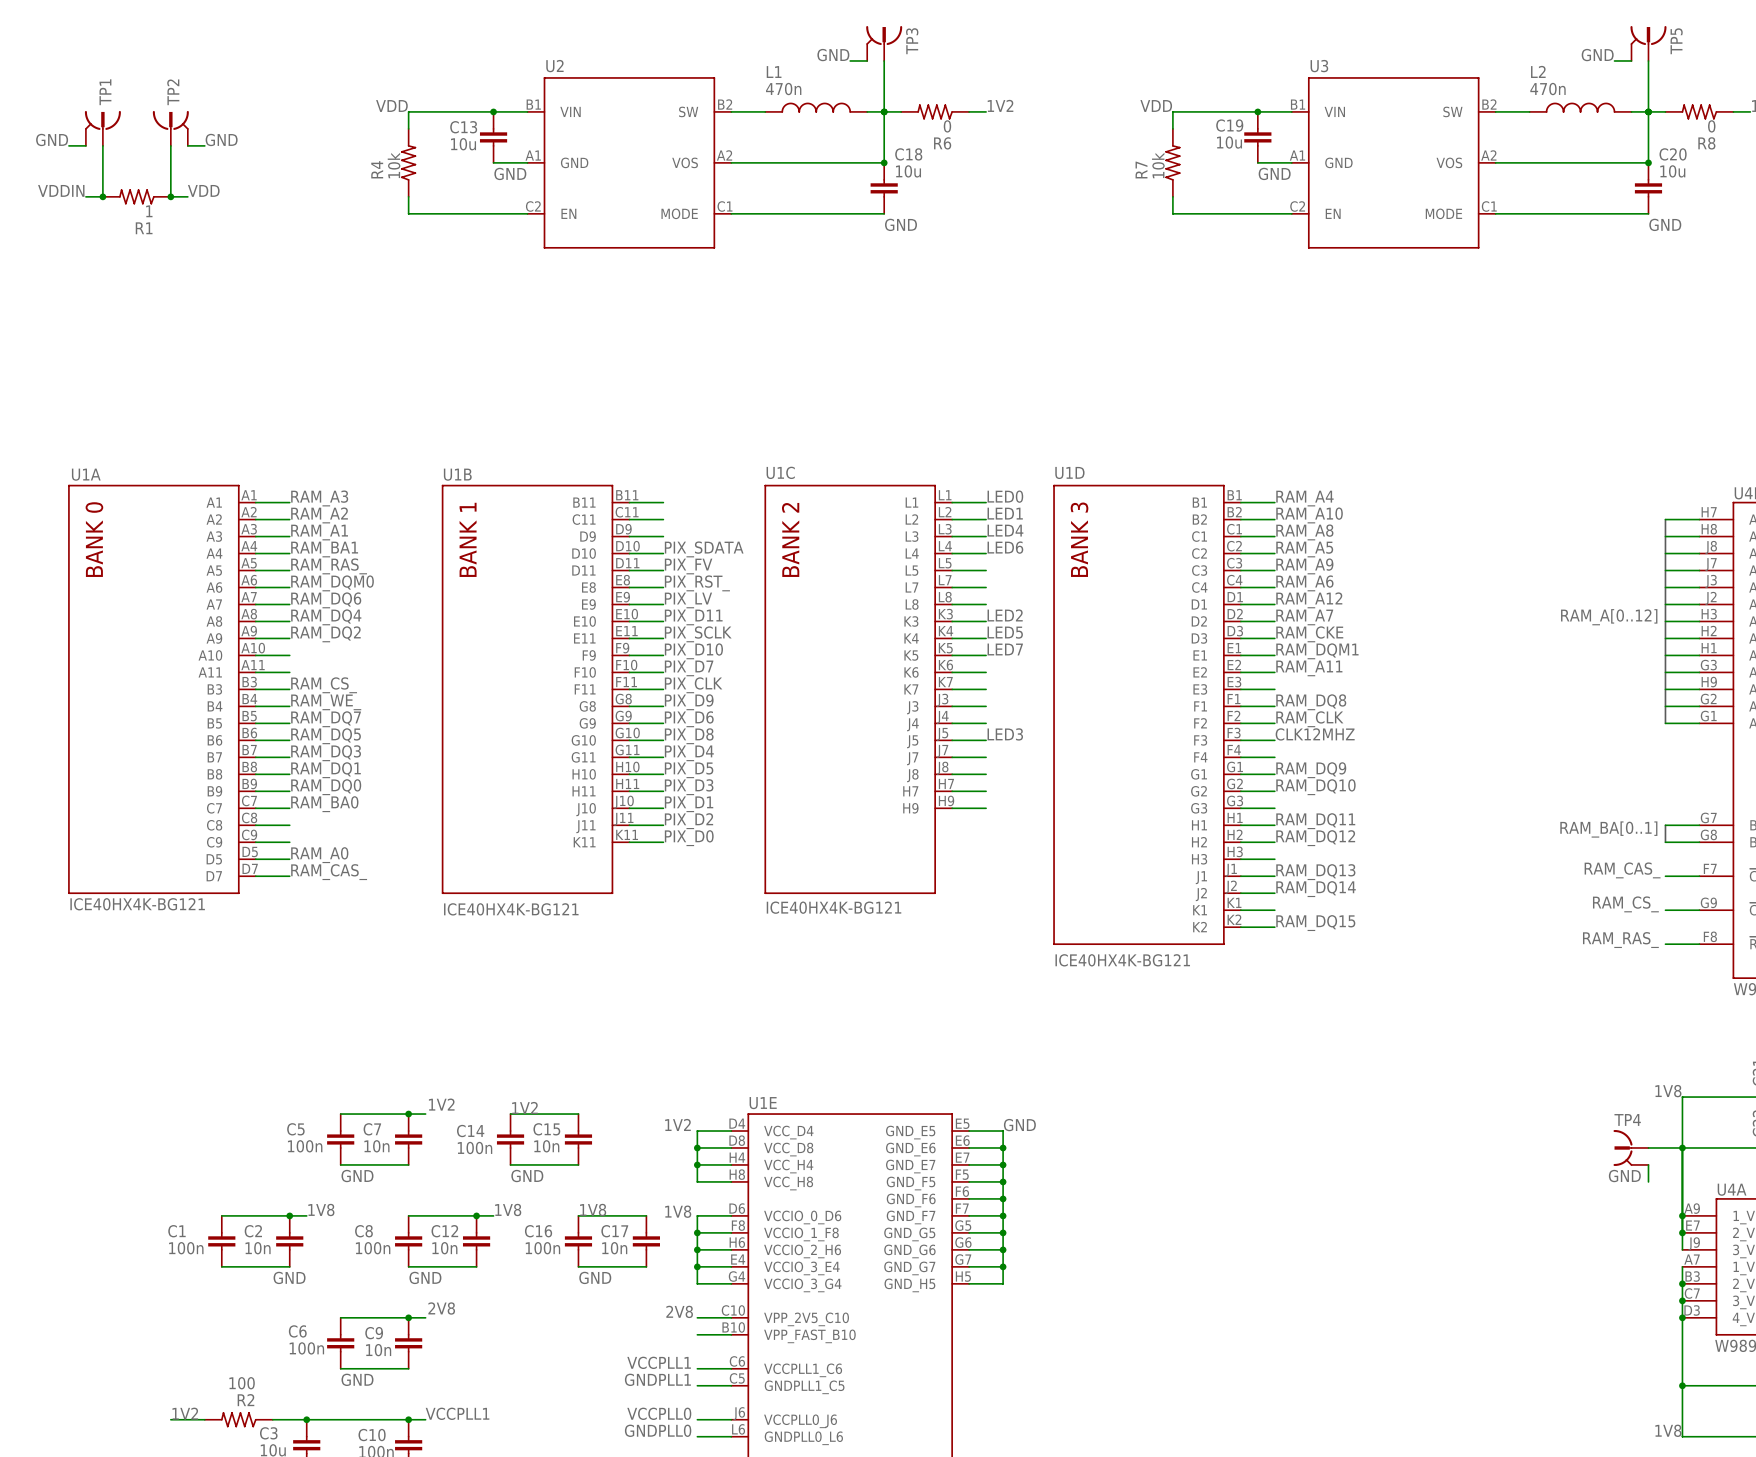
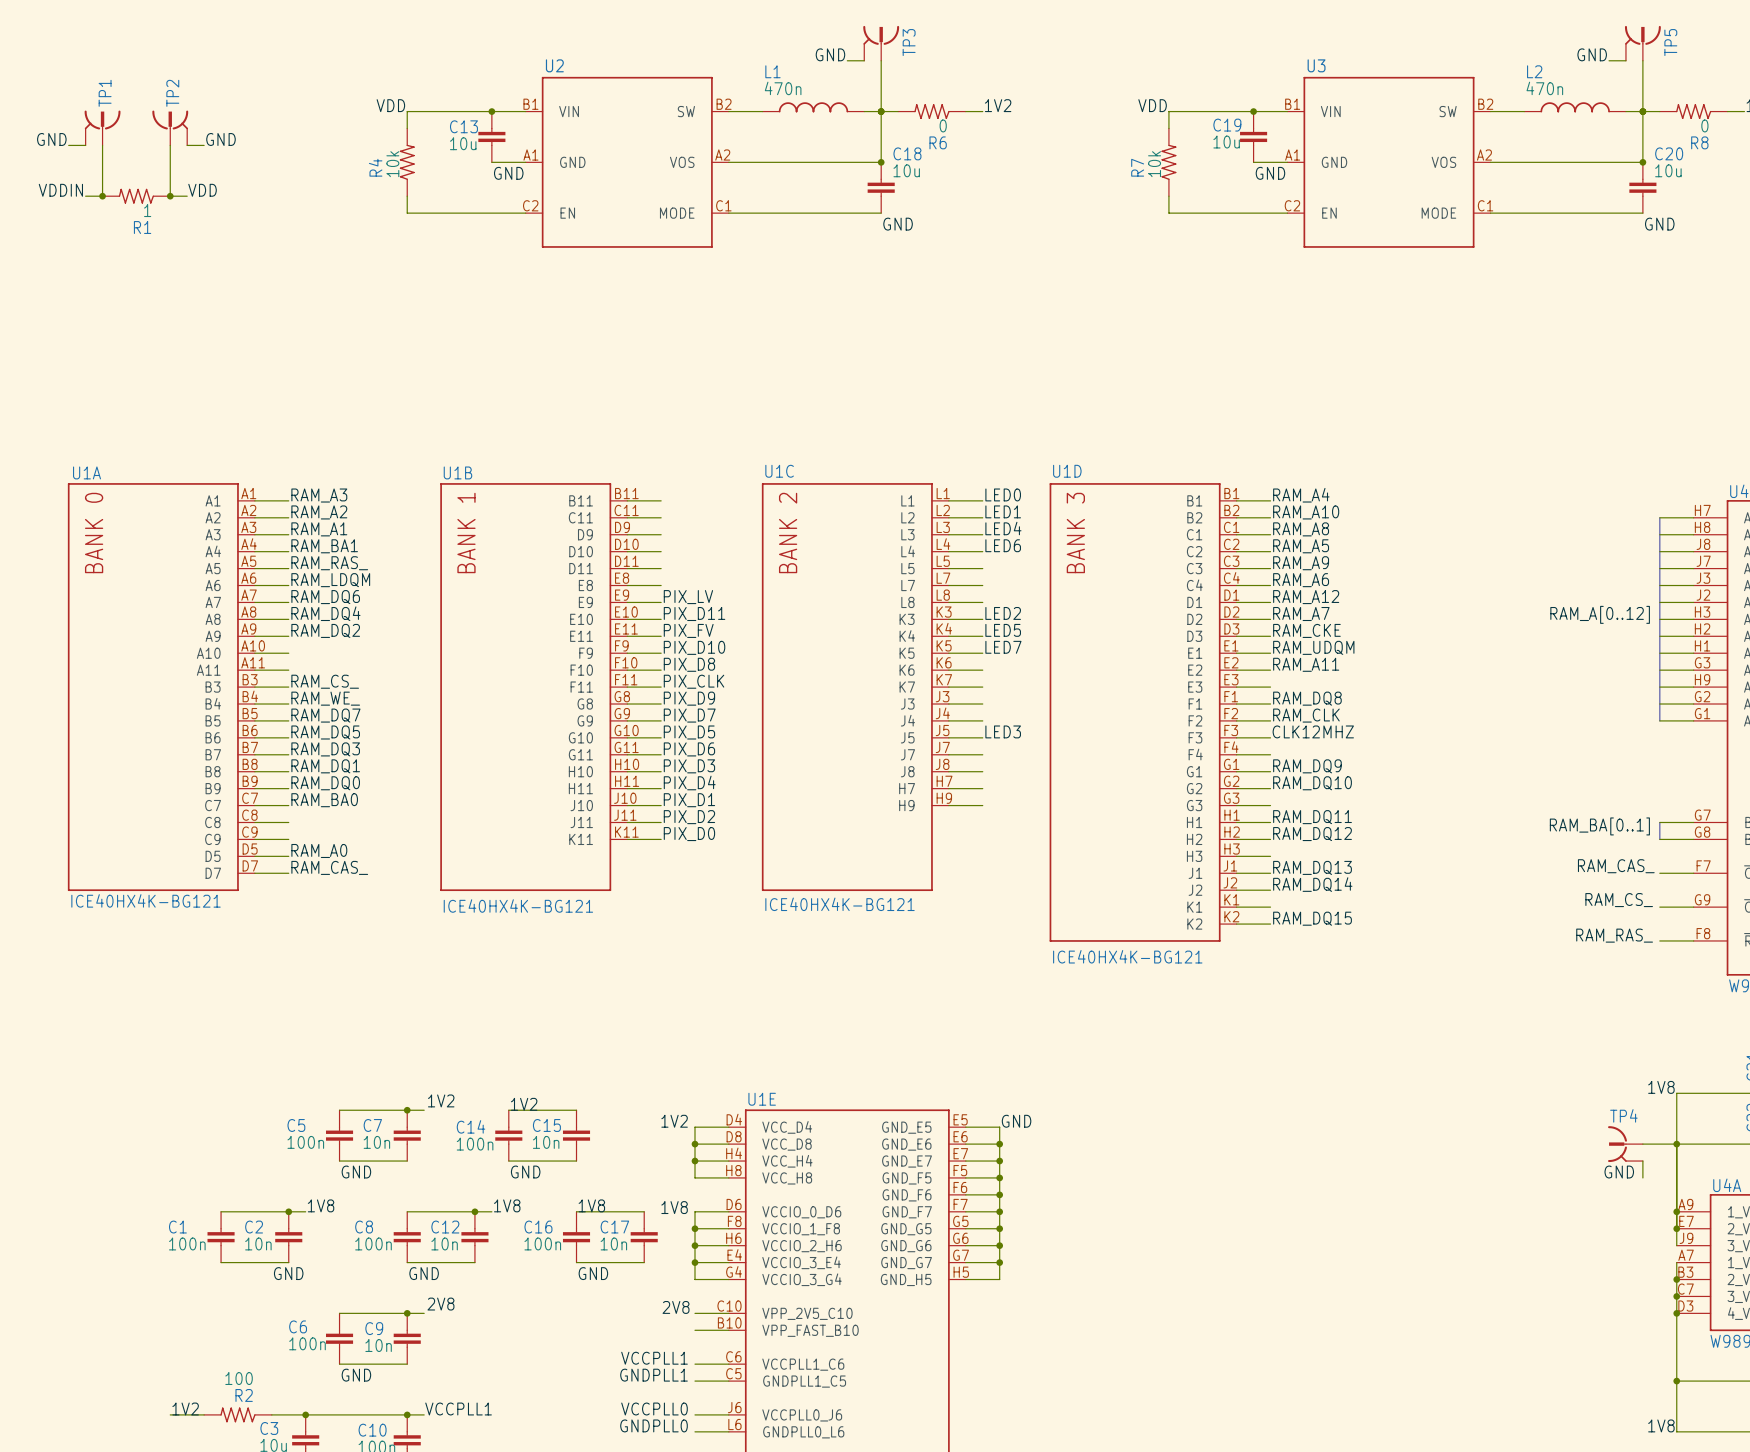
label: PIX_SDATA (704, 549) -> none
label: PIX_FV (688, 566) -> none
label: RAM_DQM0 (332, 583) -> RAM_LDQM (330, 580)
label: PIX_RST_ (697, 583) -> none
label: PIX_SCLK (698, 634) -> PIX_FV (688, 630)
label: RAM_DQM1 (1317, 651) -> RAM_UDQM (1313, 647)
label: PIX_D7 (689, 668) -> PIX_D8 (689, 664)
label: PIX_D6 (689, 719) -> PIX_D7 (689, 715)
label: PIX_D8 (689, 736) -> PIX_D5 (689, 732)
label: PIX_D4 (689, 753) -> PIX_D6 (689, 749)
label: PIX_D5 (689, 770) -> PIX_D3 (689, 766)
label: PIX_D3 (689, 787) -> PIX_D4 (689, 782)

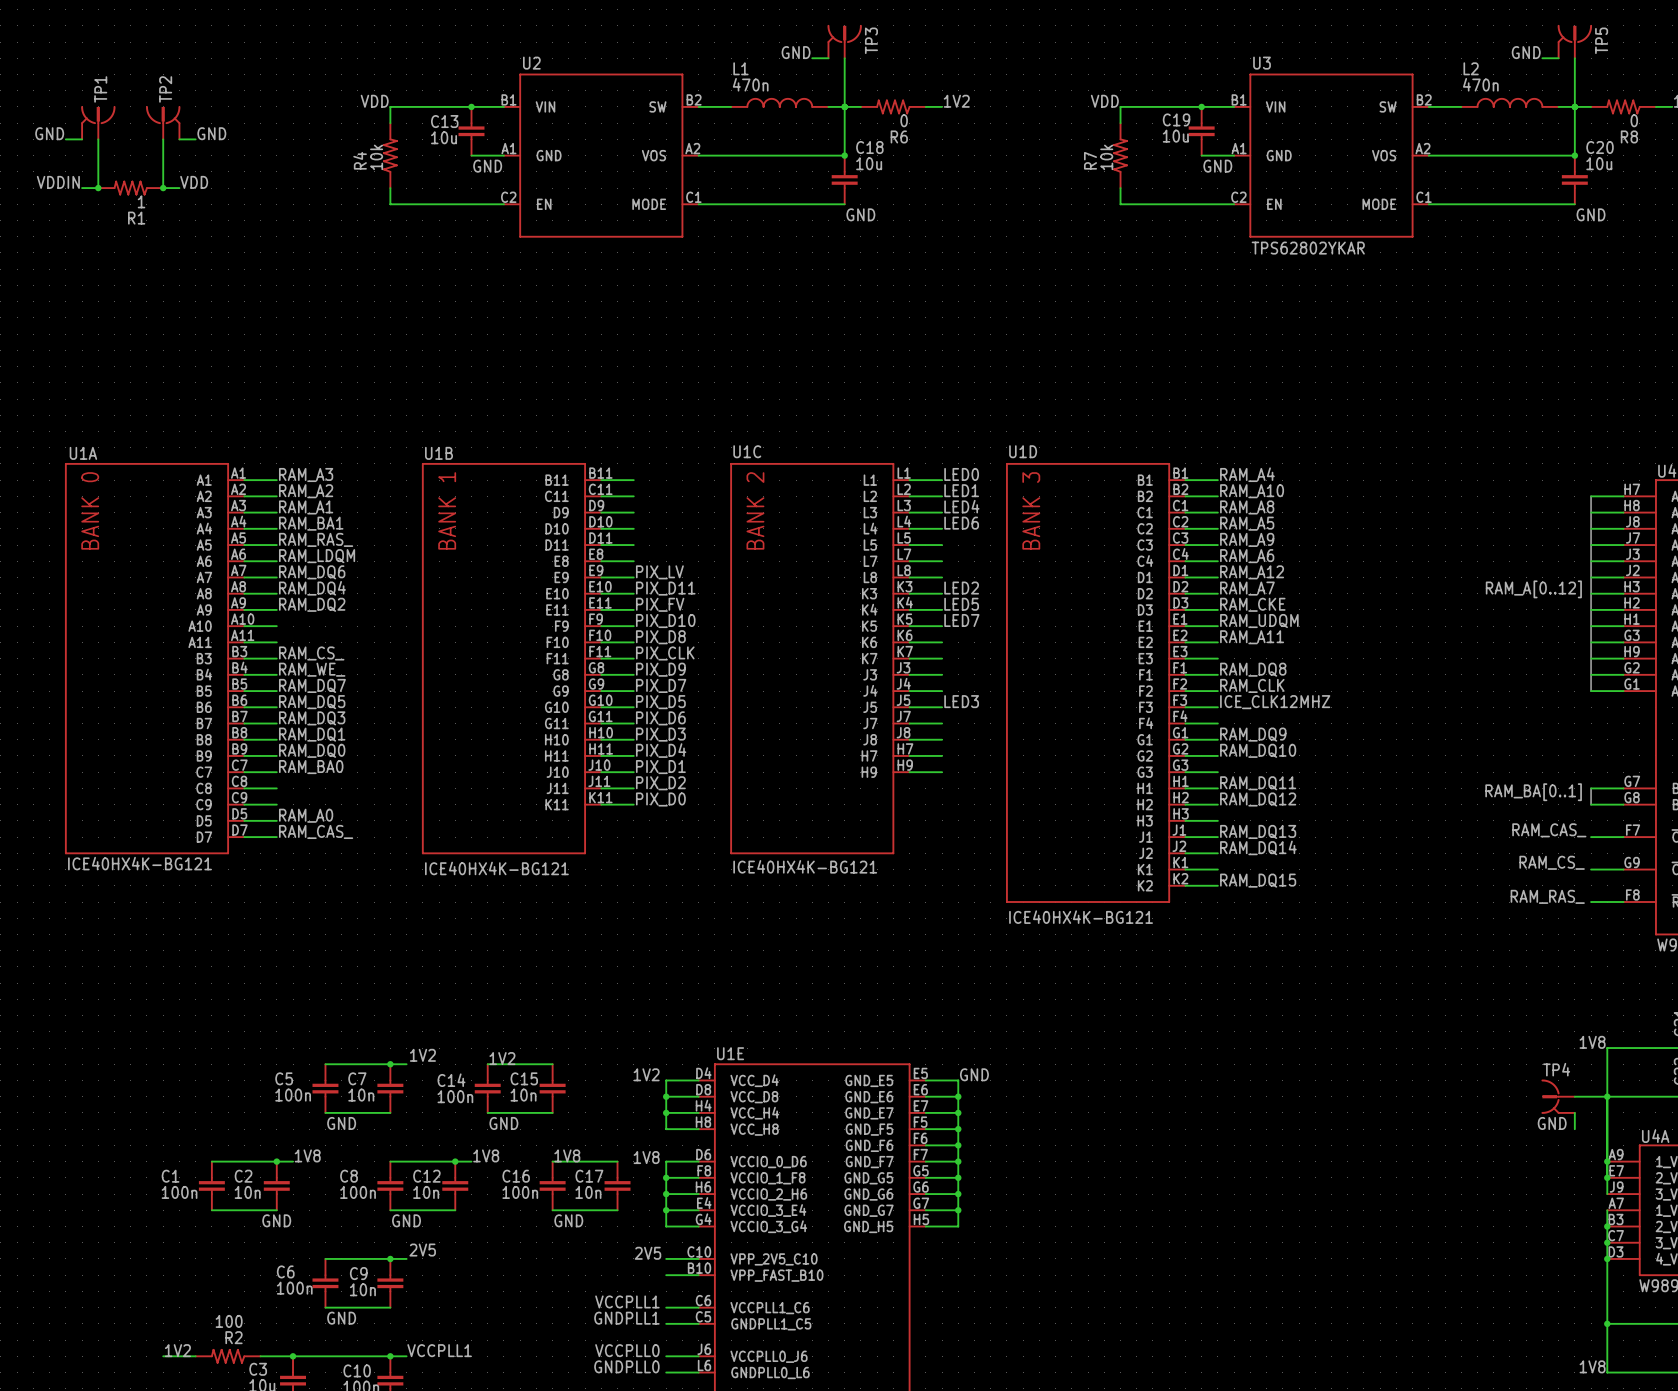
U3 text: none -> TPS62802YKAR (1308, 248)
label: CLK12MHZ (1313, 731) -> ICE_CLK12MHZ (1275, 702)
label: 2V8 (440, 1304) -> 2V5 (422, 1250)
label: 2V8 (676, 1307) -> 2V5 (648, 1253)

